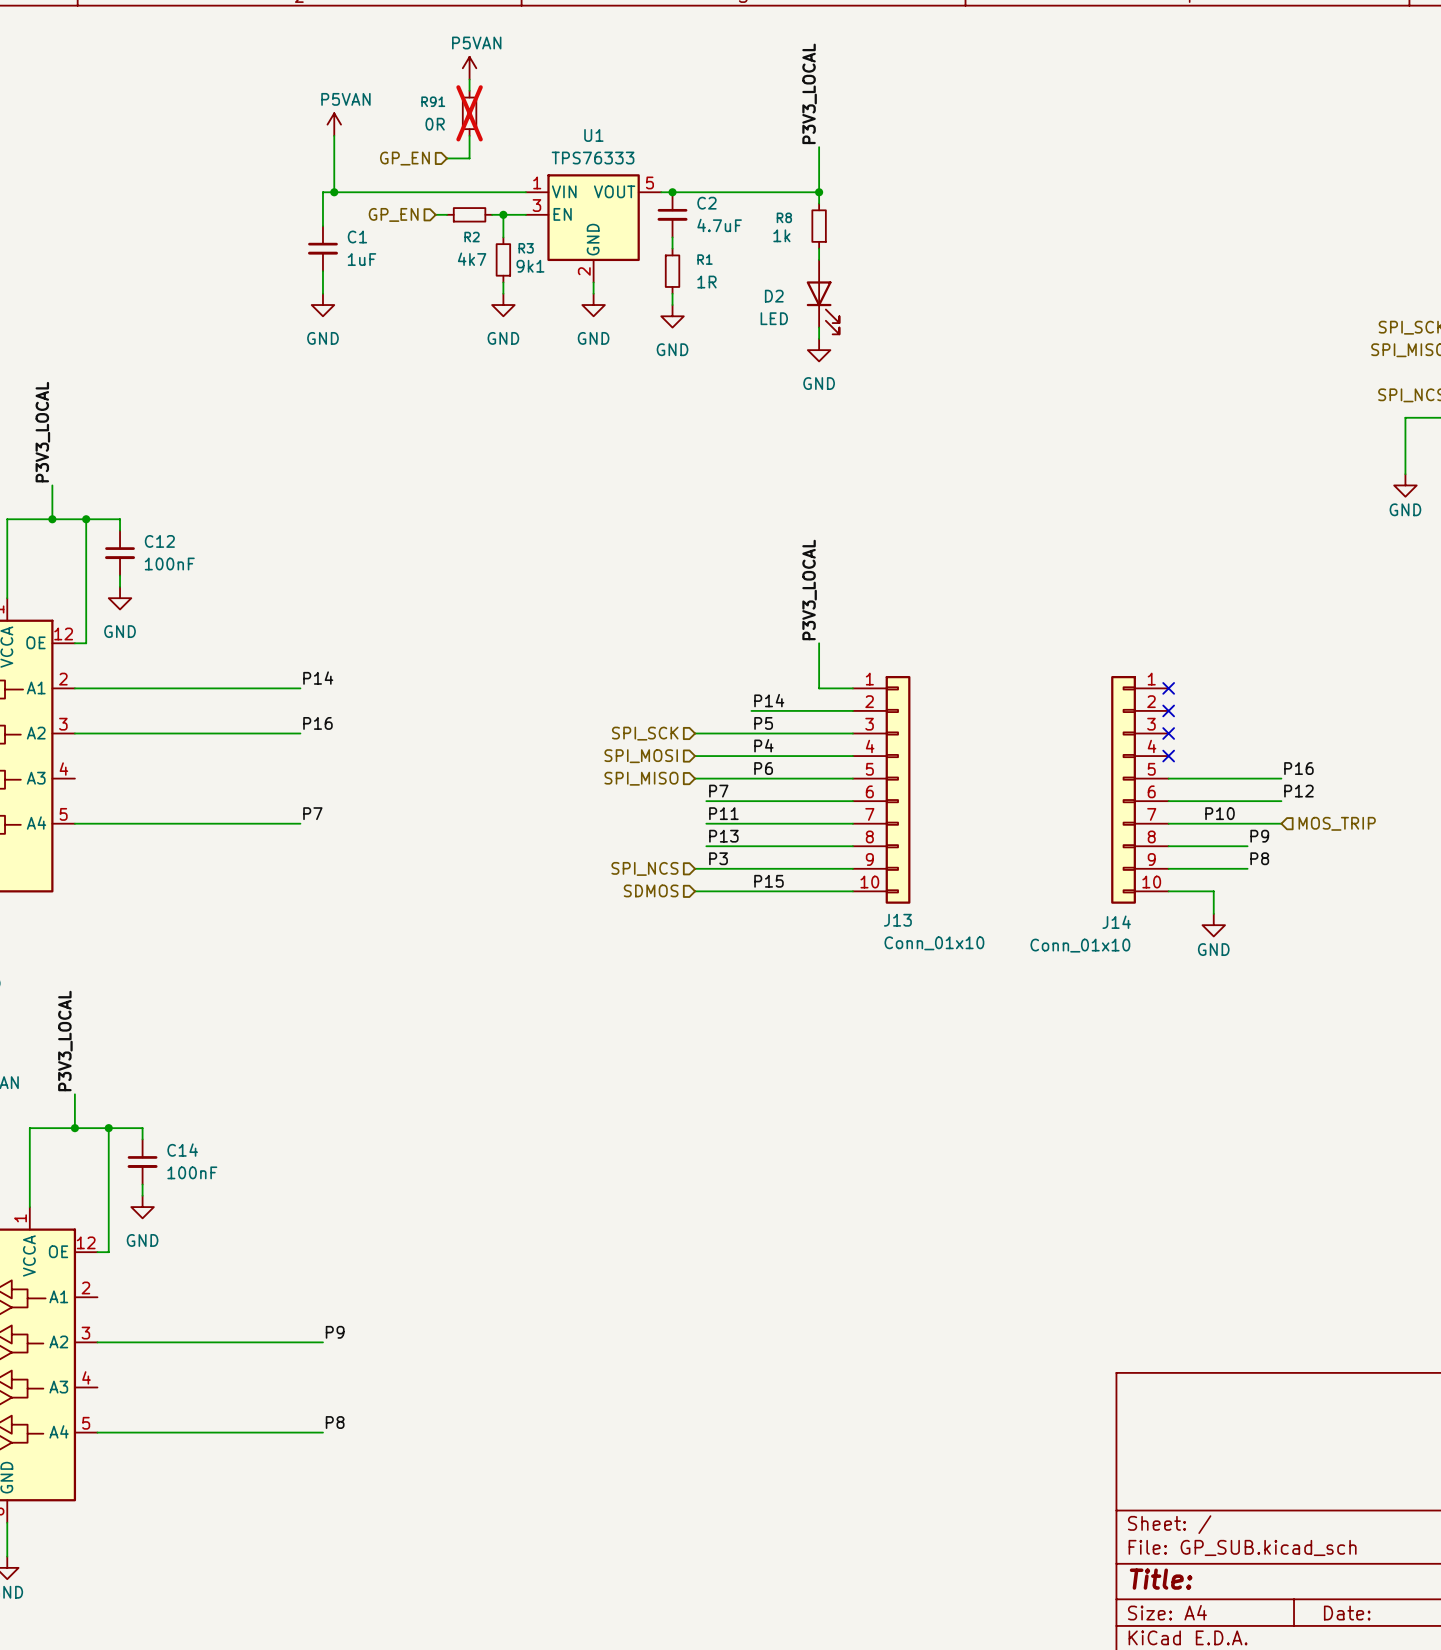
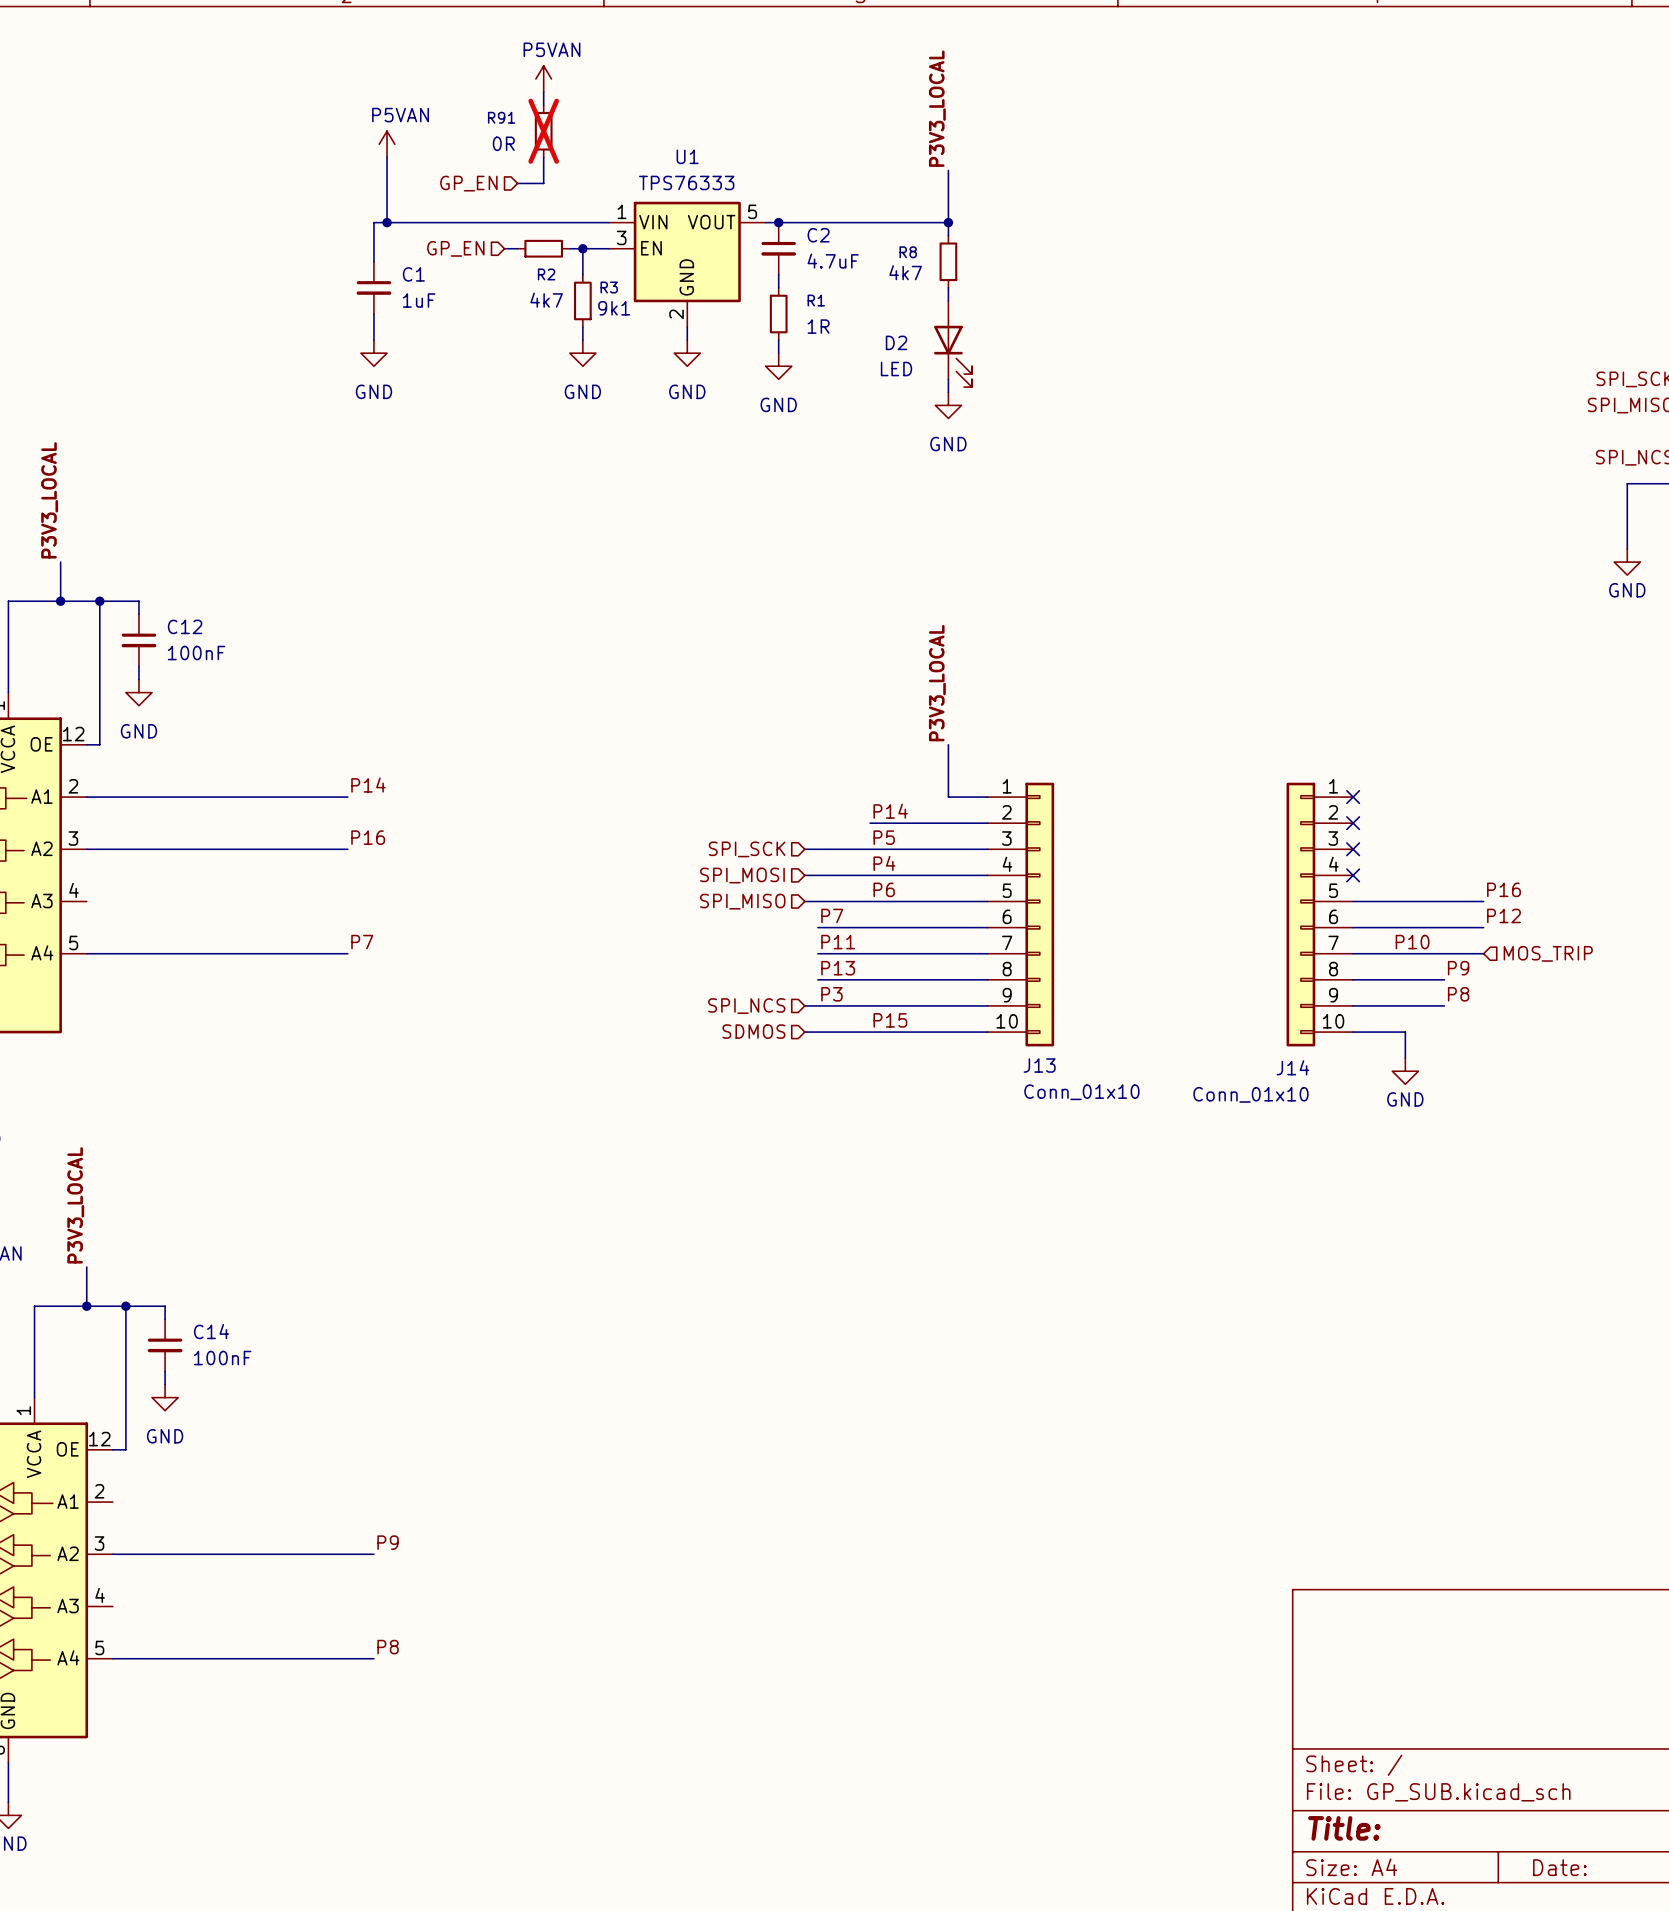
R8 value: 1k (781, 235) -> 4k7 (905, 272)

